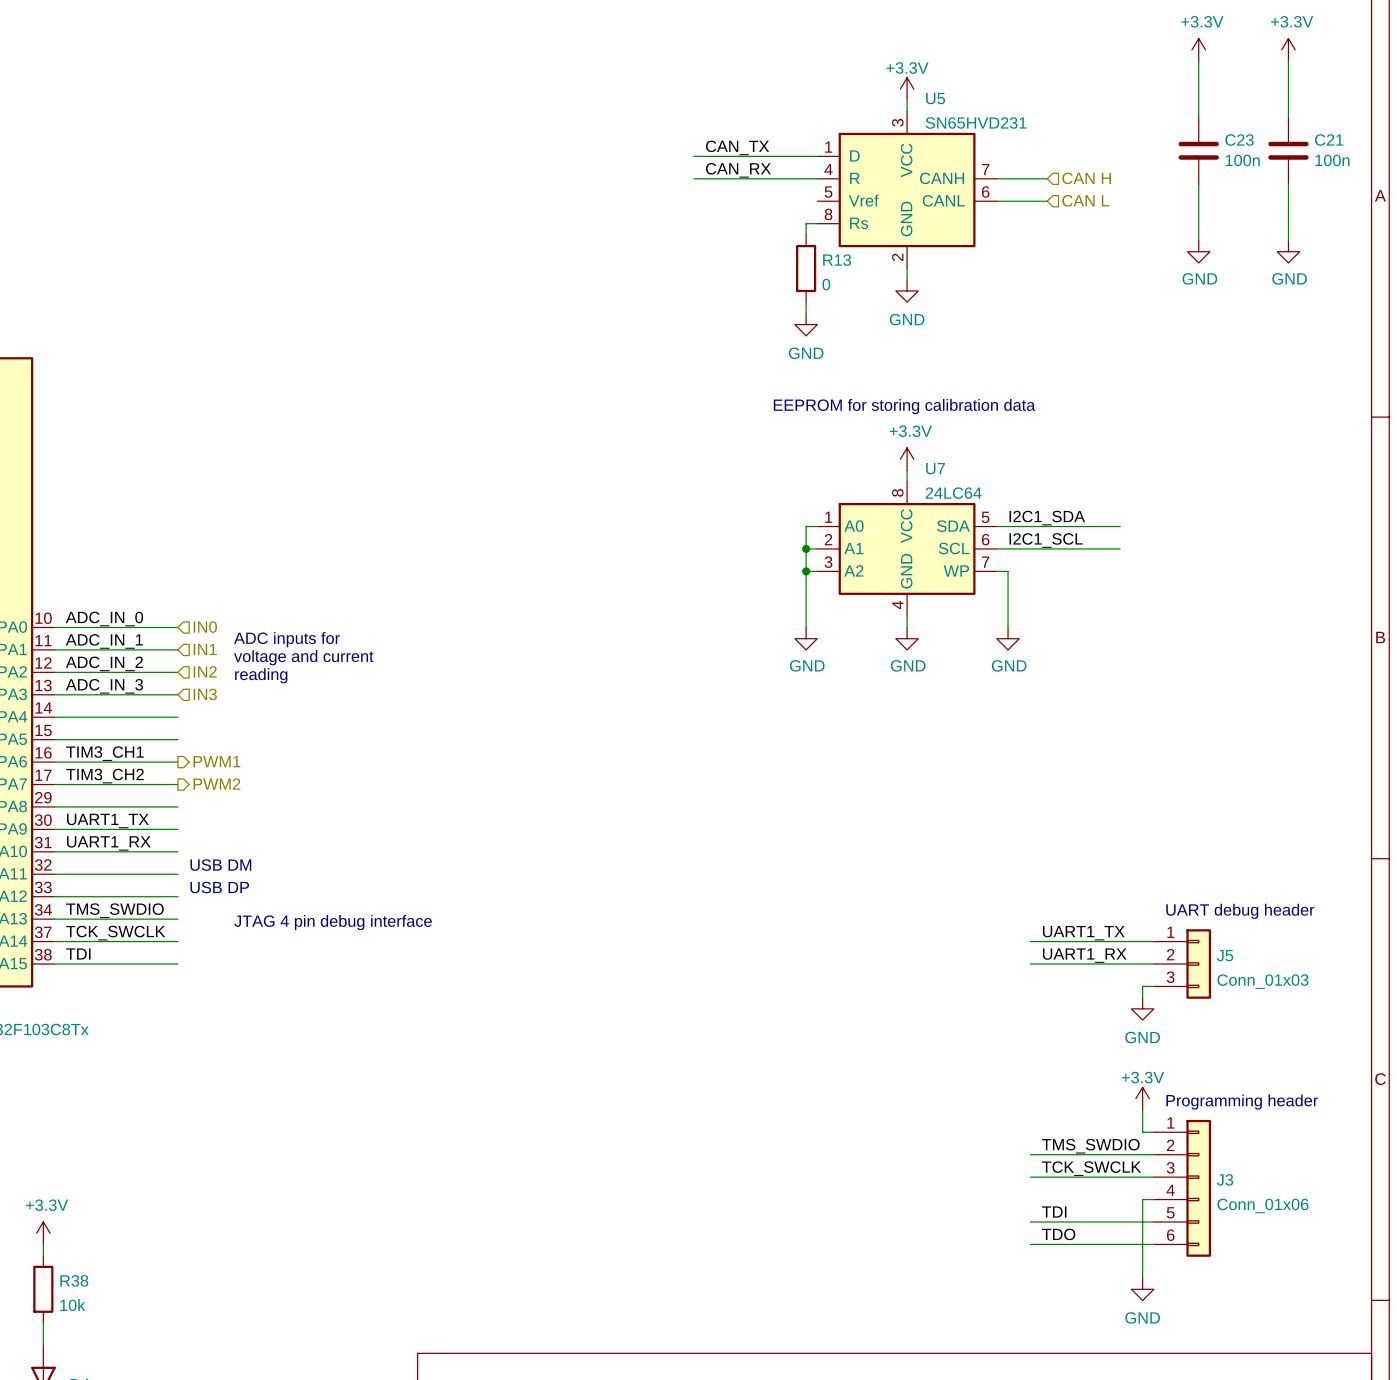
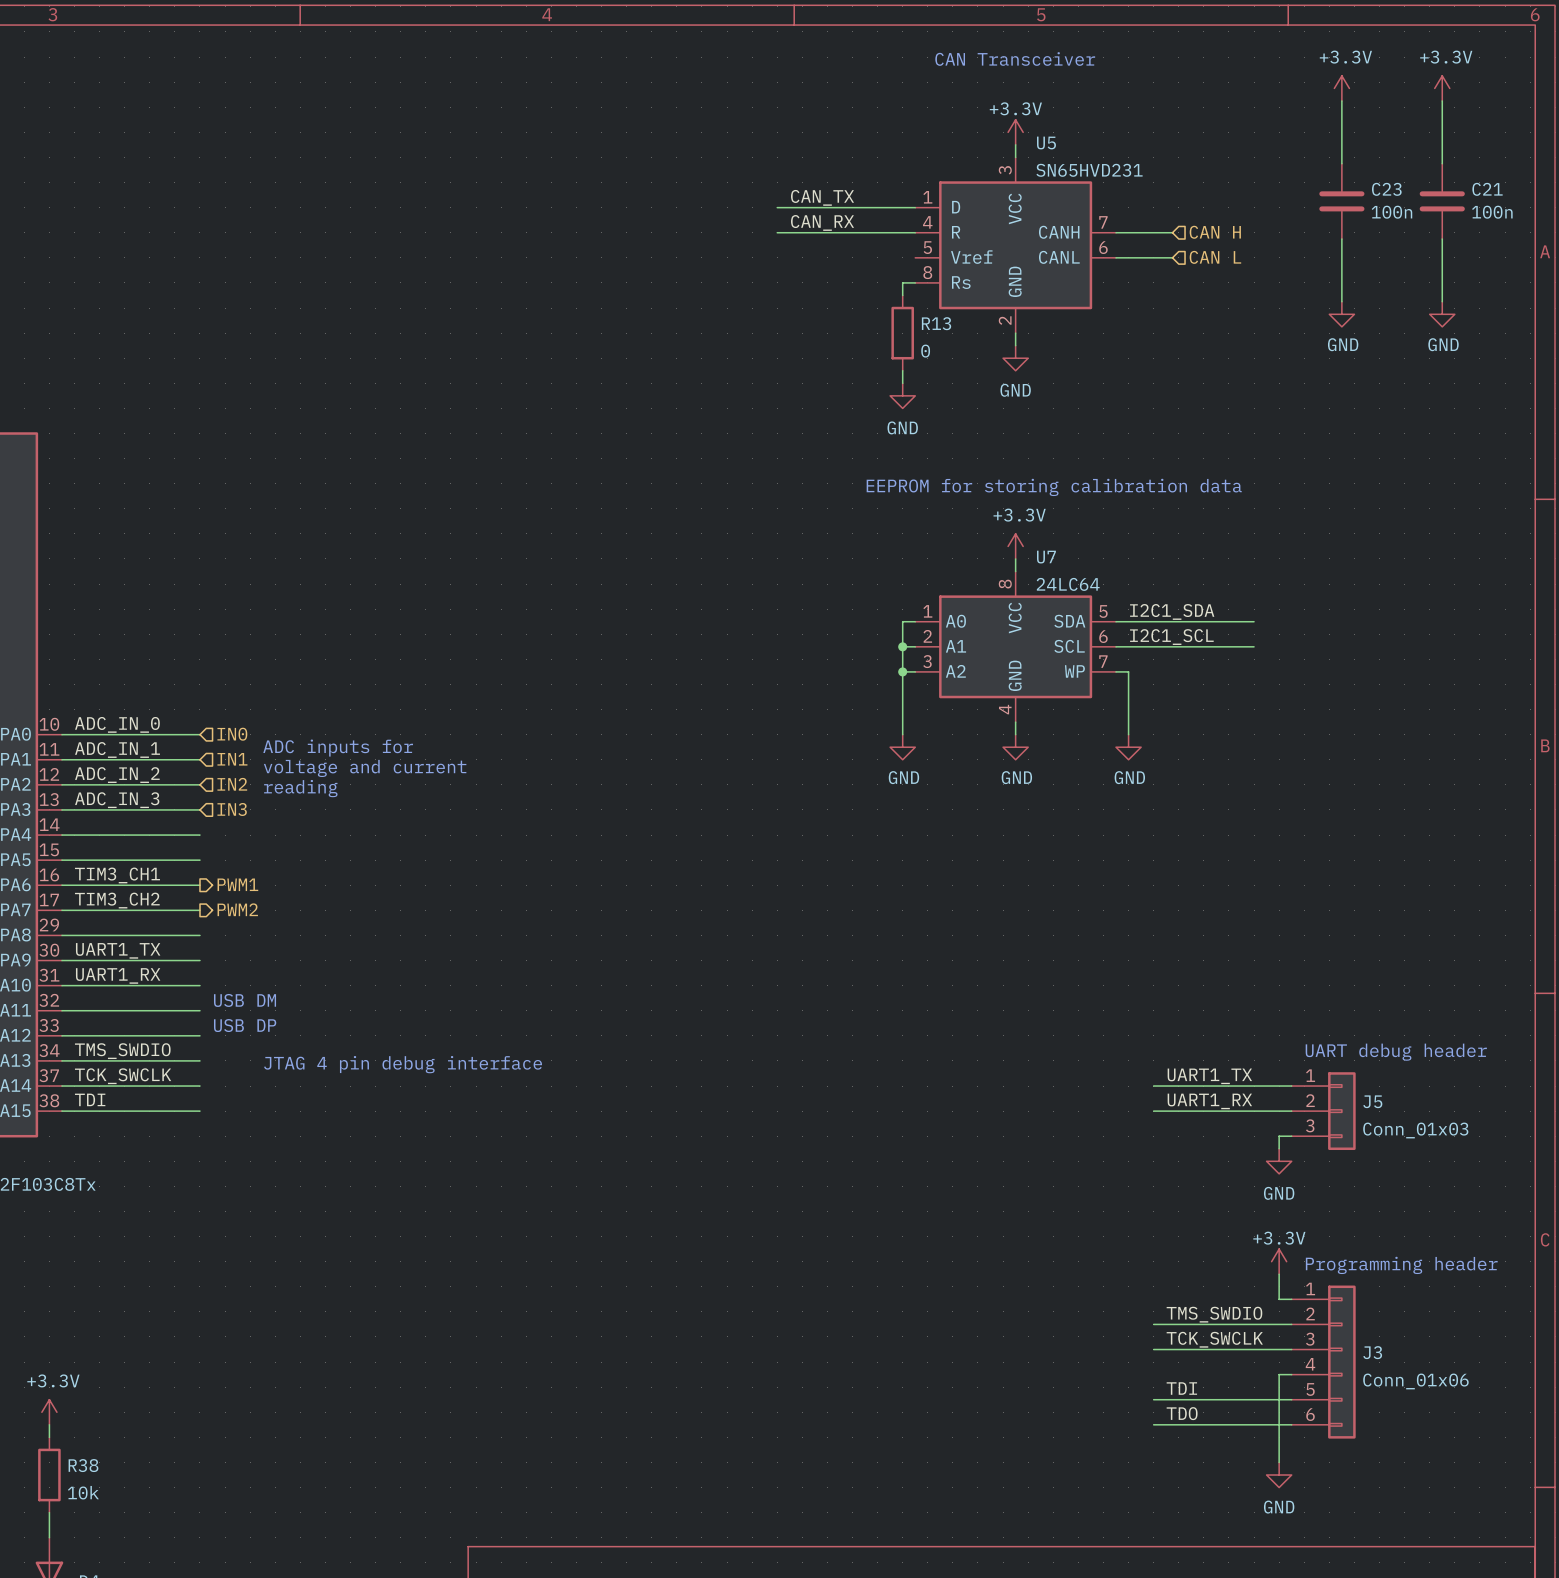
text: none -> CAN Transceiver (1015, 58)

